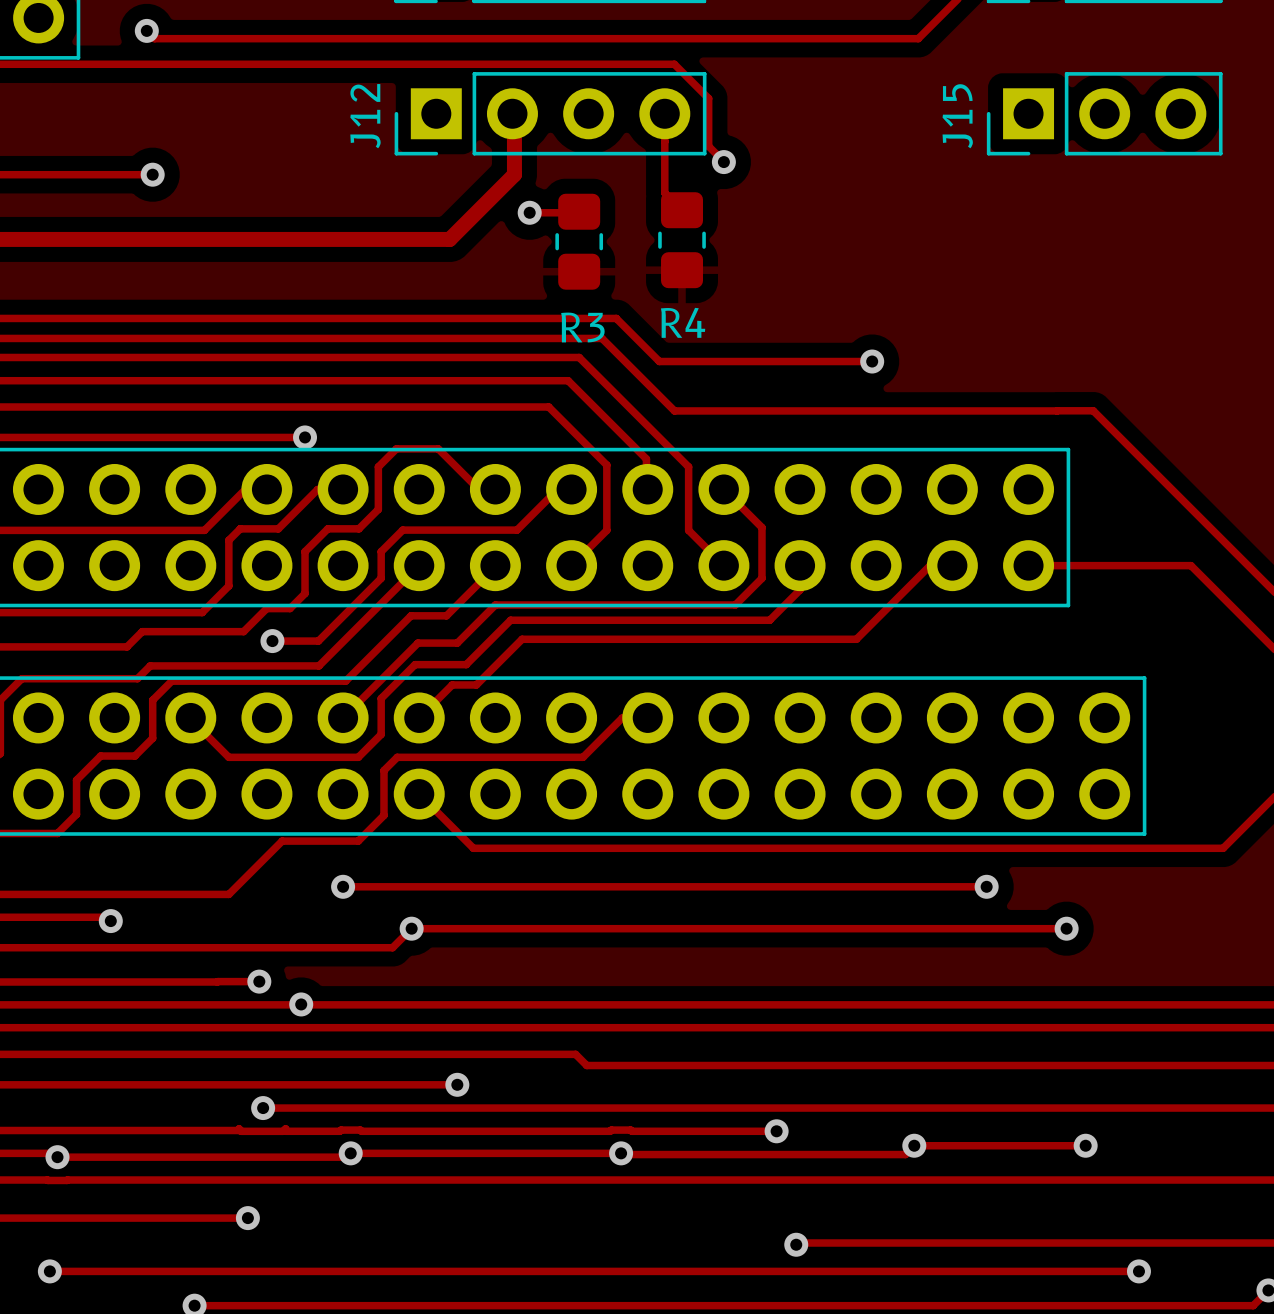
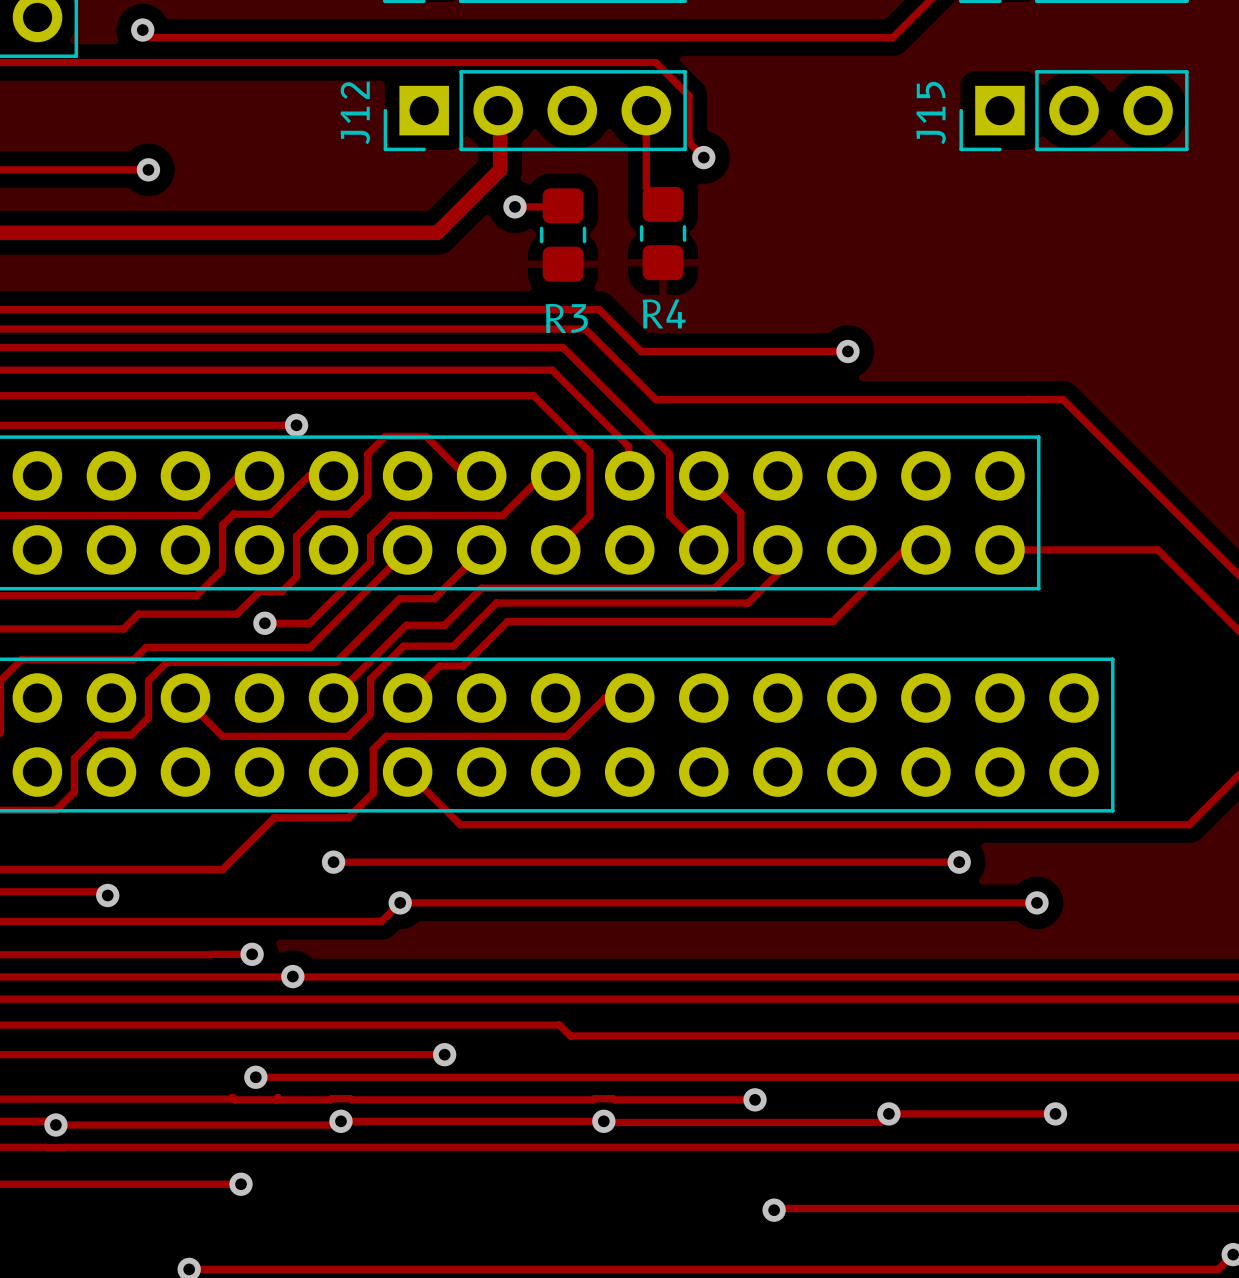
track: (49, 1271) (1138, 1271) -> none
via: (49, 1271) -> none
via: (1138, 1271) -> none

